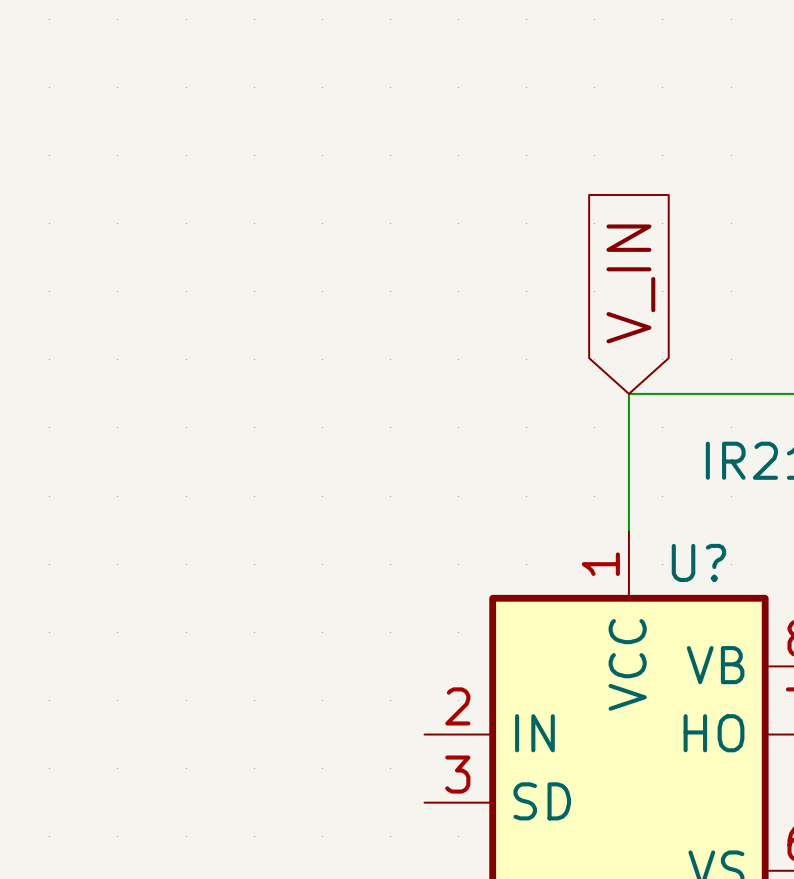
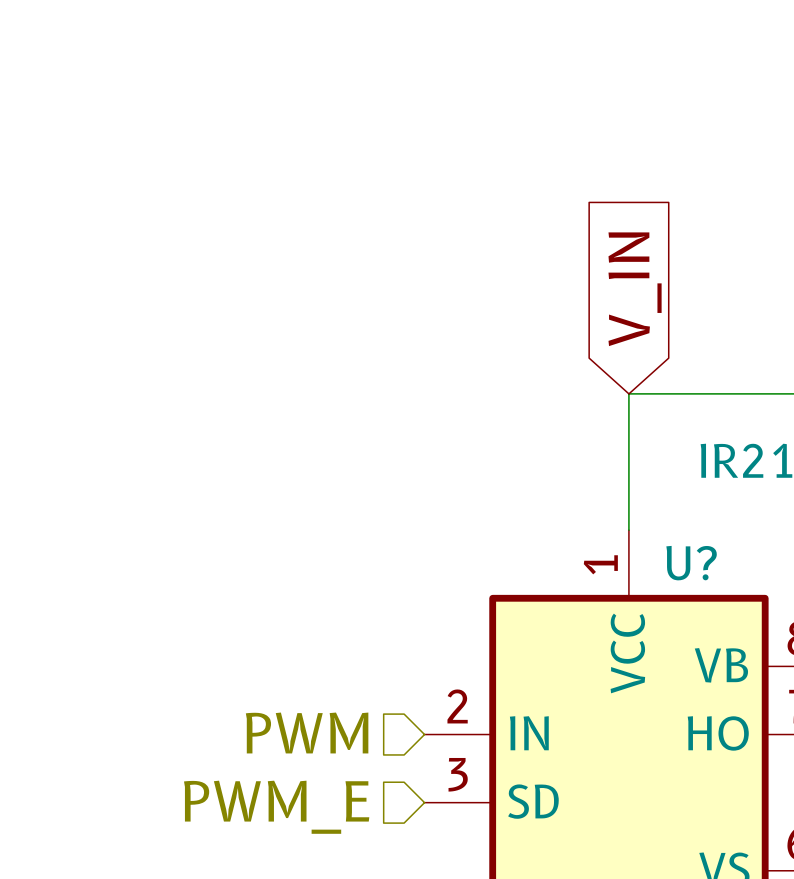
hierarchical label: none -> PWM (307, 733)
hierarchical label: none -> PWM_E (276, 807)

